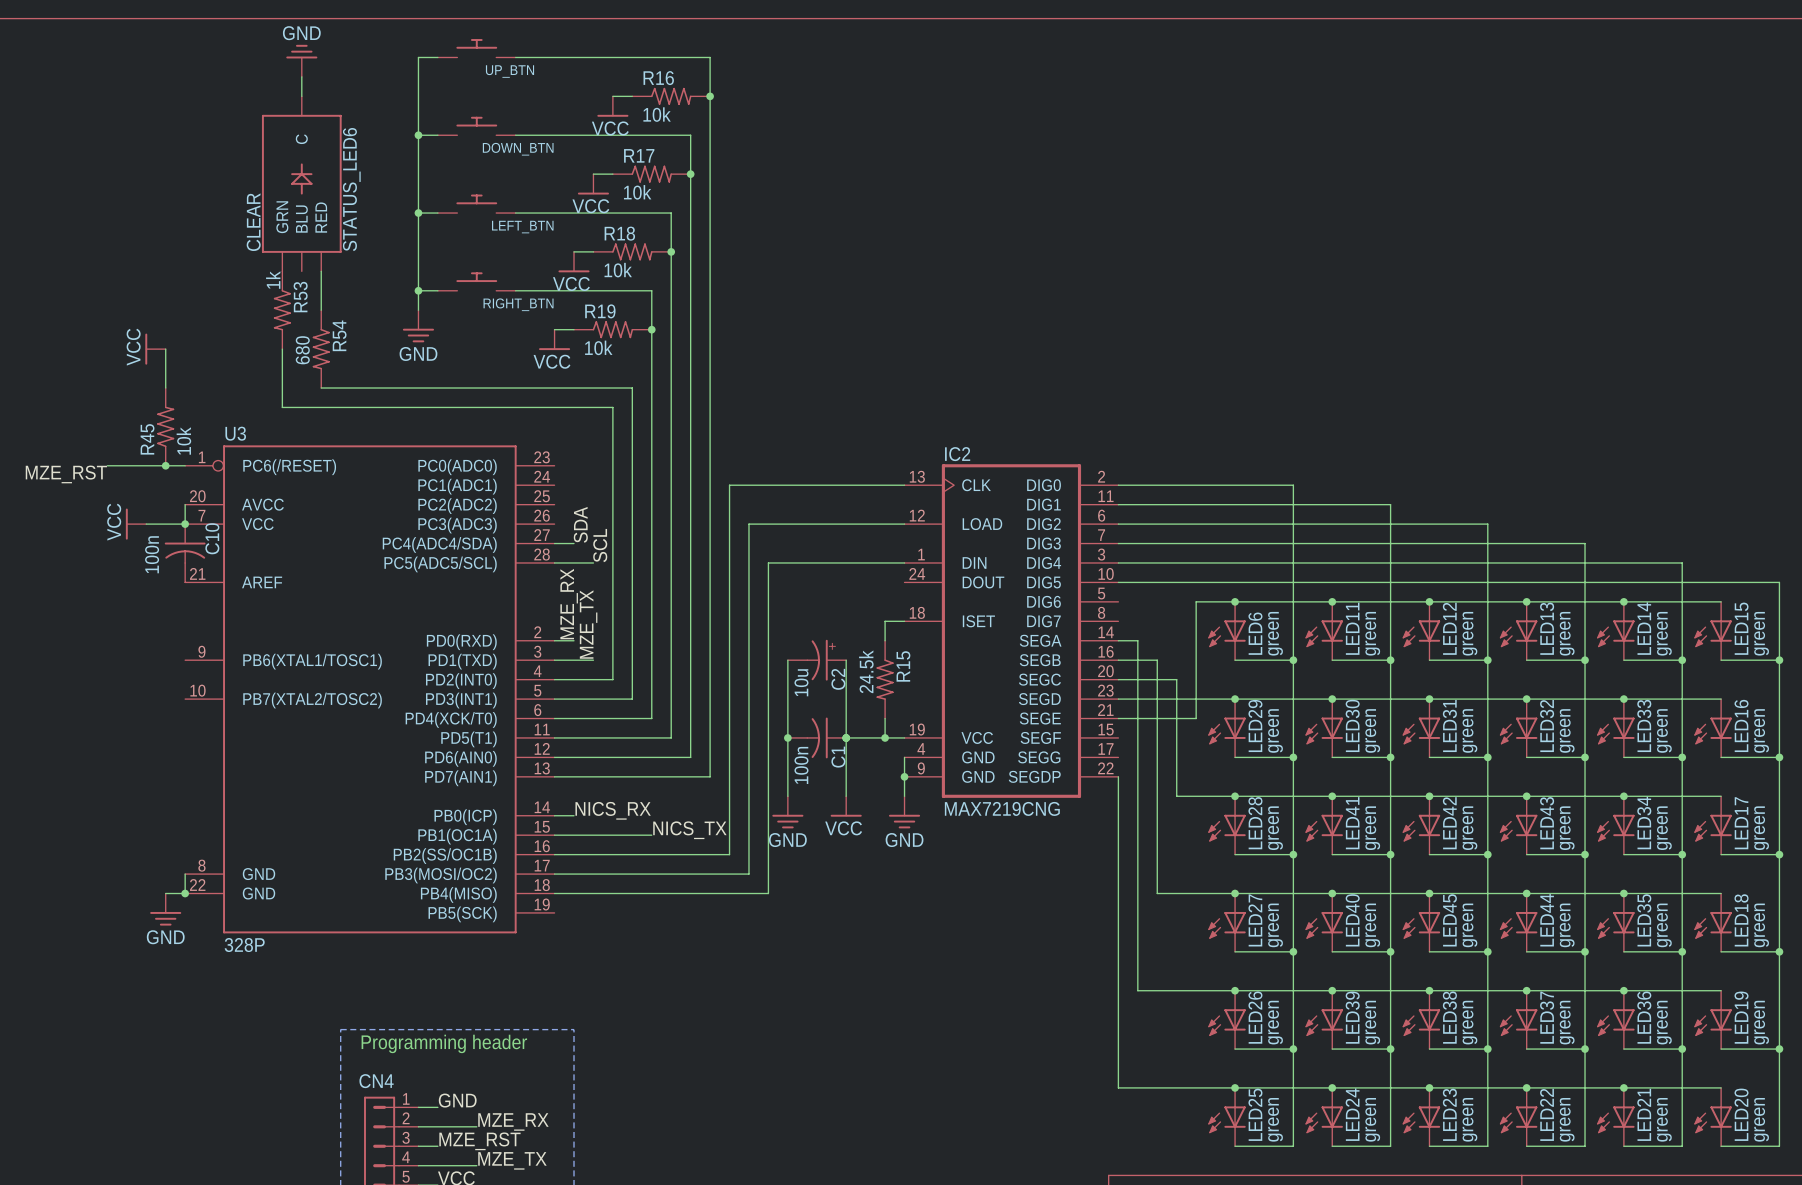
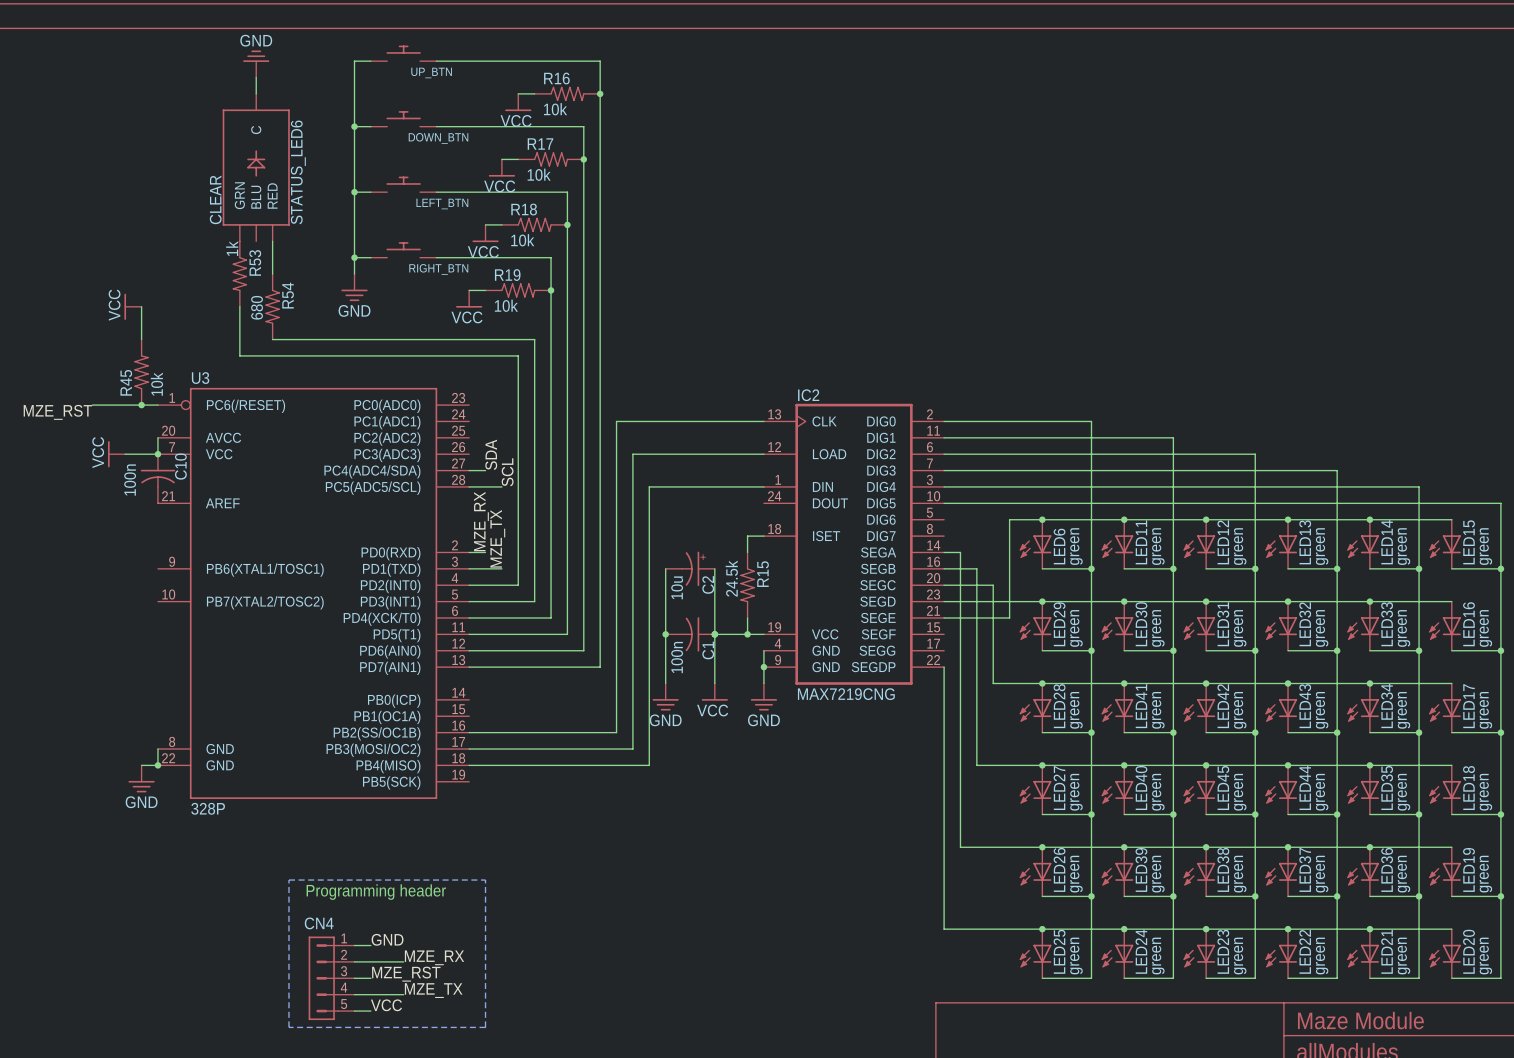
label: NICS_RX (613, 810) -> none
wire: (554, 815) (574, 815) -> none
label: NICS_TX (689, 830) -> none
wire: (554, 835) (651, 835) -> none

